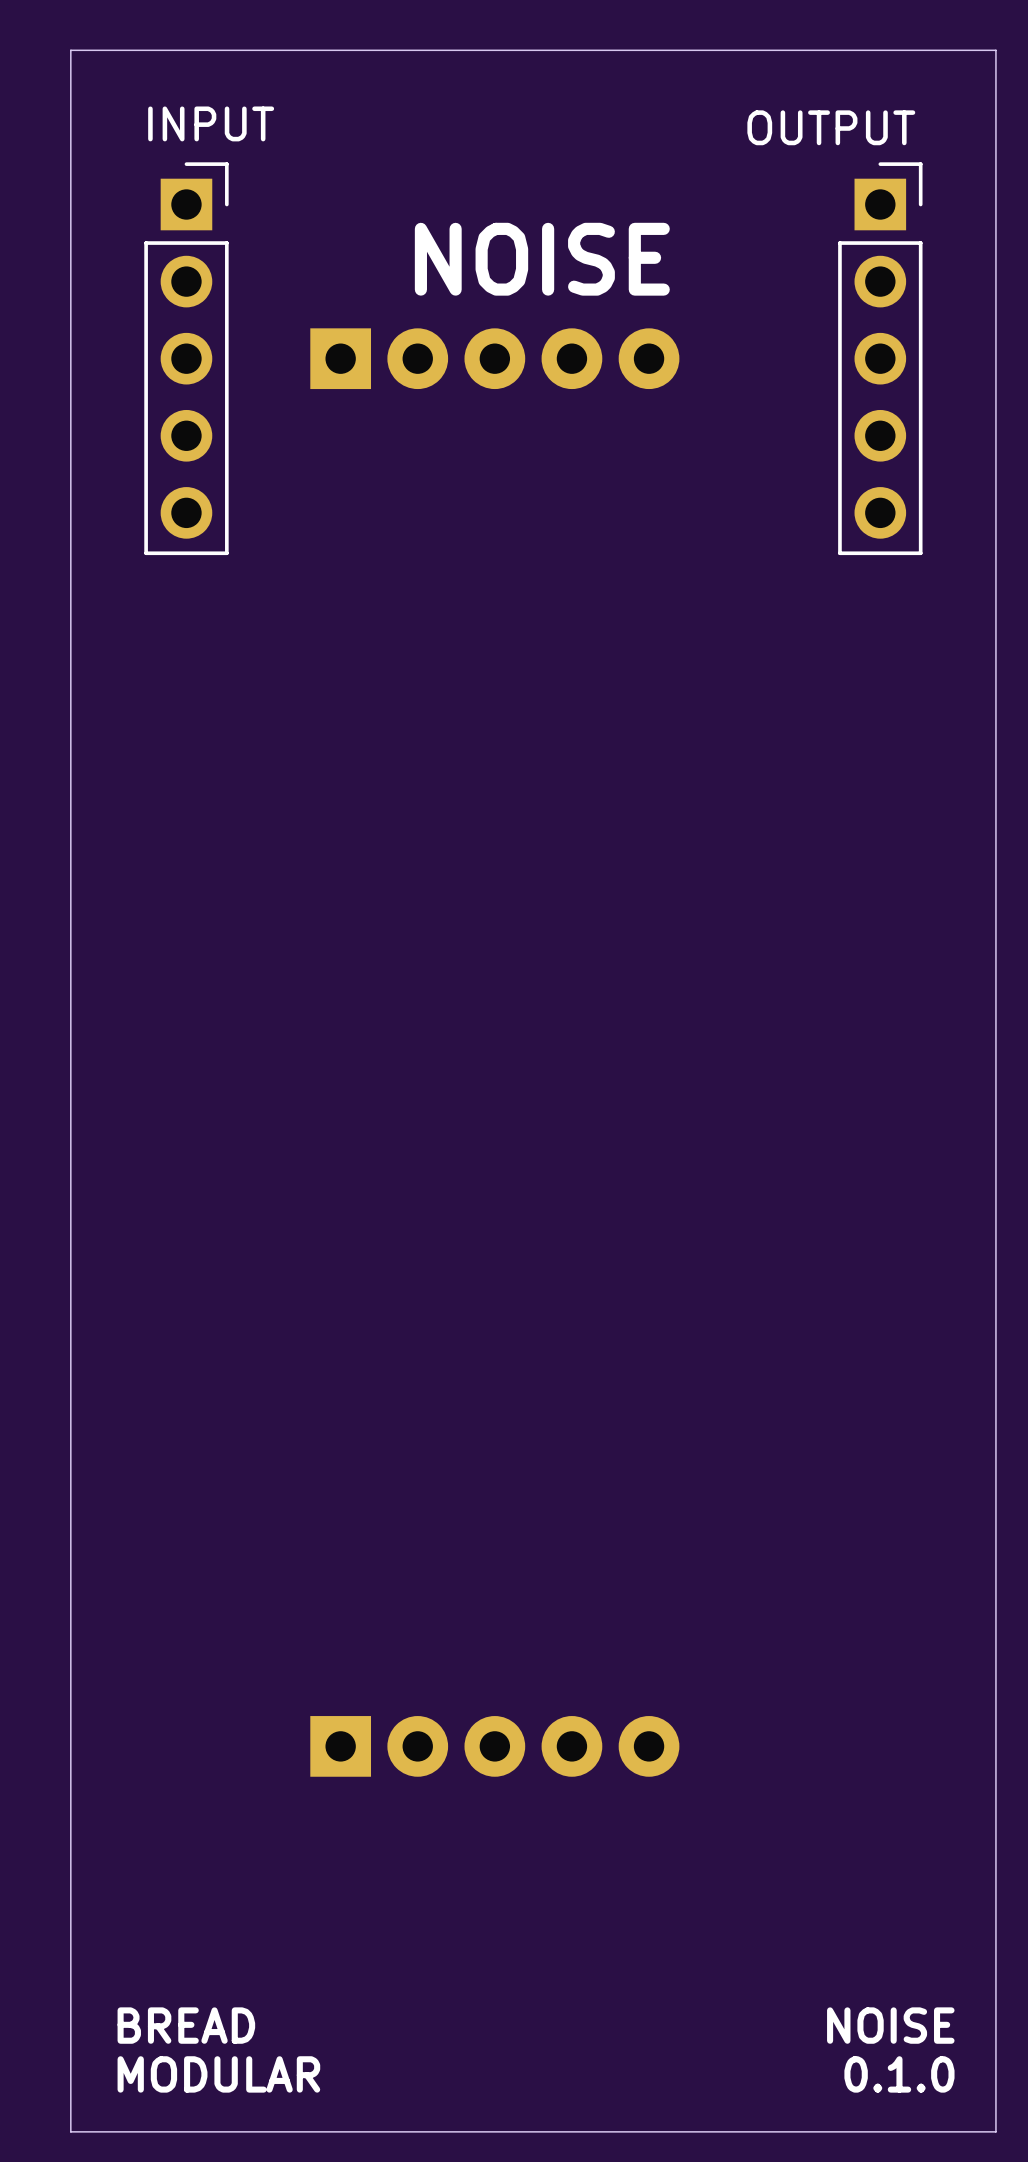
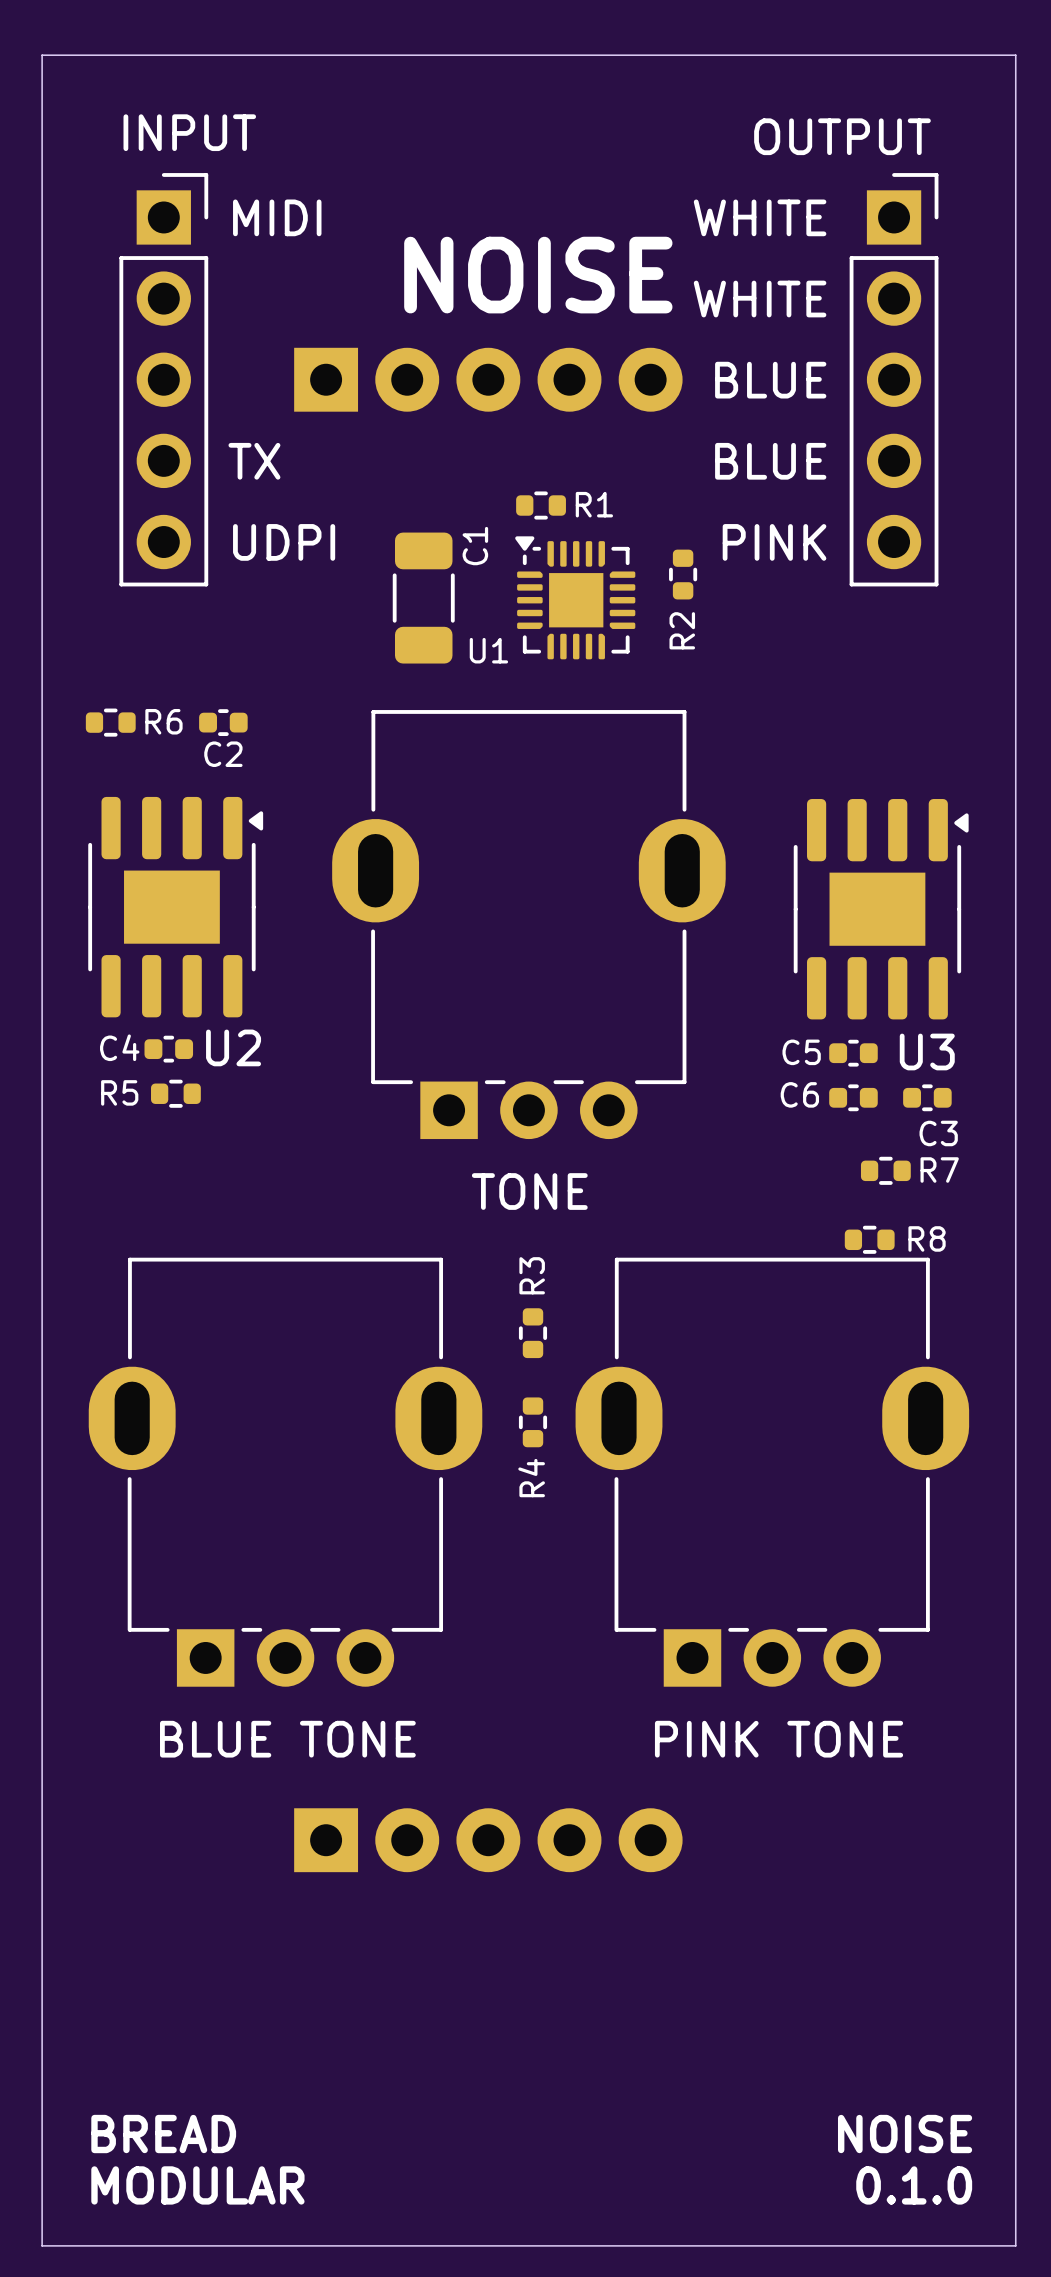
text: none -> MIDI (277, 217)
text: none -> WHITE (760, 217)
text: none -> WHITE (760, 299)
text: none -> BLUE (770, 380)
text: none -> TX (254, 461)
text: none -> BLUE (770, 461)
R1: none -> (541, 505)
text: none -> UDPI (284, 542)
text: none -> PINK (774, 542)
R2: none -> (683, 574)
U1: none -> (575, 597)
C1: none -> (423, 598)
R6: none -> (110, 722)
C2: none -> (223, 722)
U2: none -> (175, 907)
U3: none -> (881, 909)
part: none -> (528, 924)
C4: none -> (168, 1049)
C5: none -> (853, 1053)
R5: none -> (175, 1093)
C6: none -> (853, 1097)
C3: none -> (927, 1097)
R7: none -> (885, 1170)
text: none -> TONE (529, 1191)
R8: none -> (869, 1239)
R3: none -> (532, 1333)
R4: none -> (532, 1422)
part: none -> (285, 1472)
part: none -> (772, 1472)
text: none -> BLUE TONE (287, 1739)
text: none -> PINK TONE (779, 1739)

